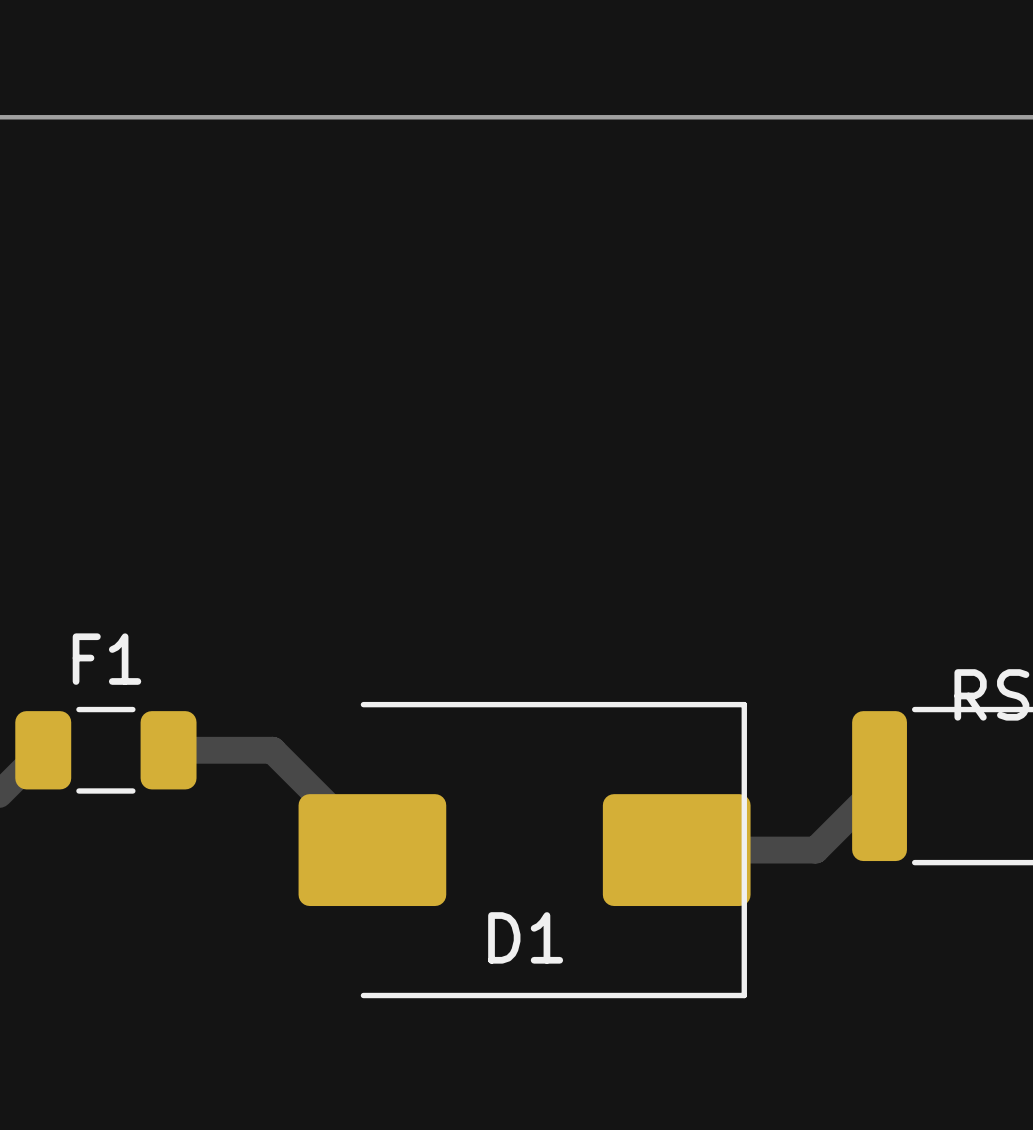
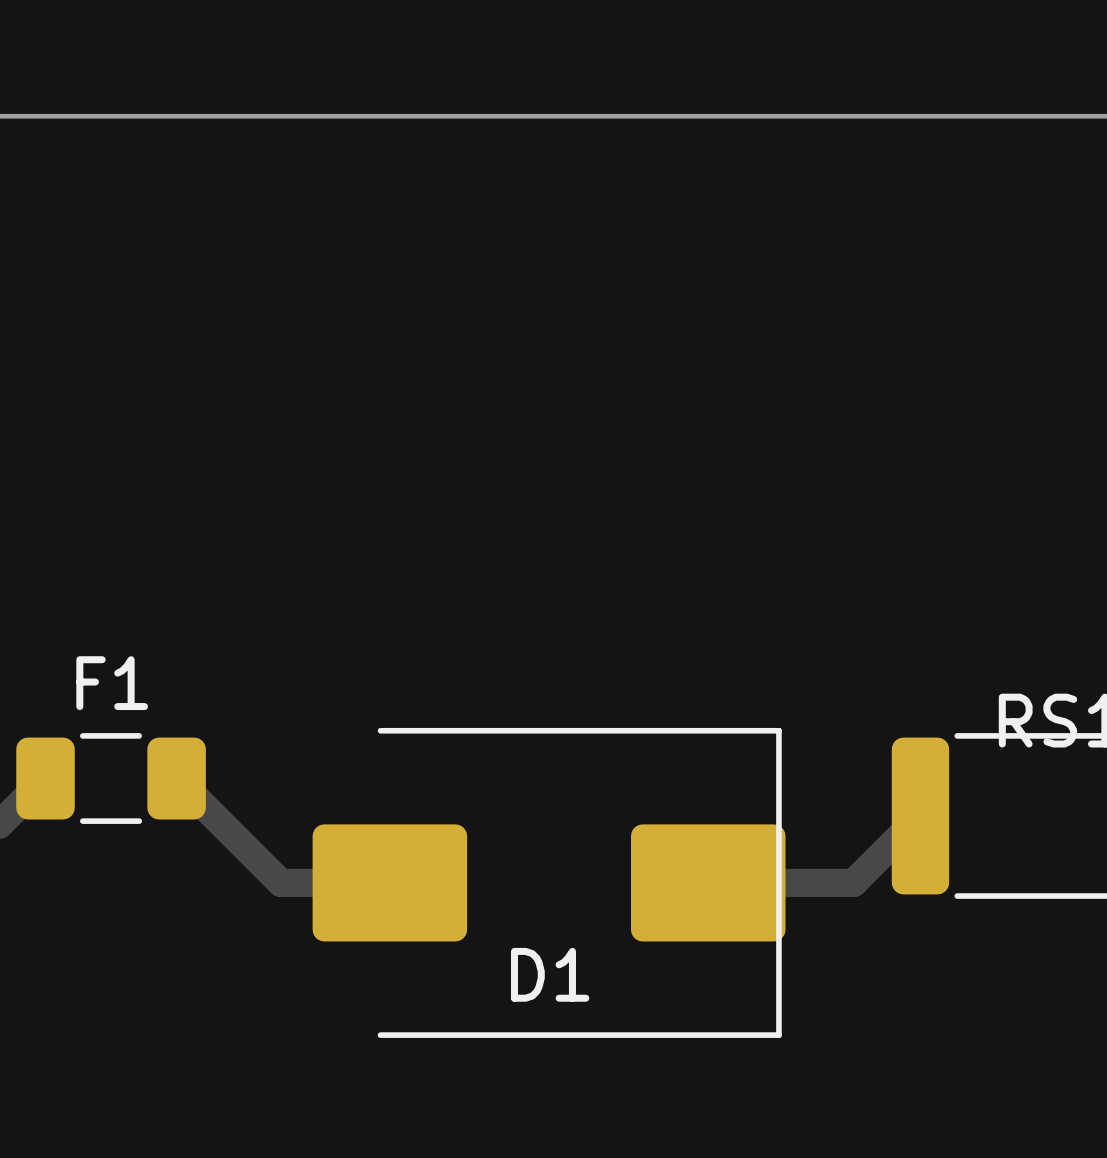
track: (168, 750) (272, 750) (372, 850) -> (176, 778) (281, 882) (389, 882)

